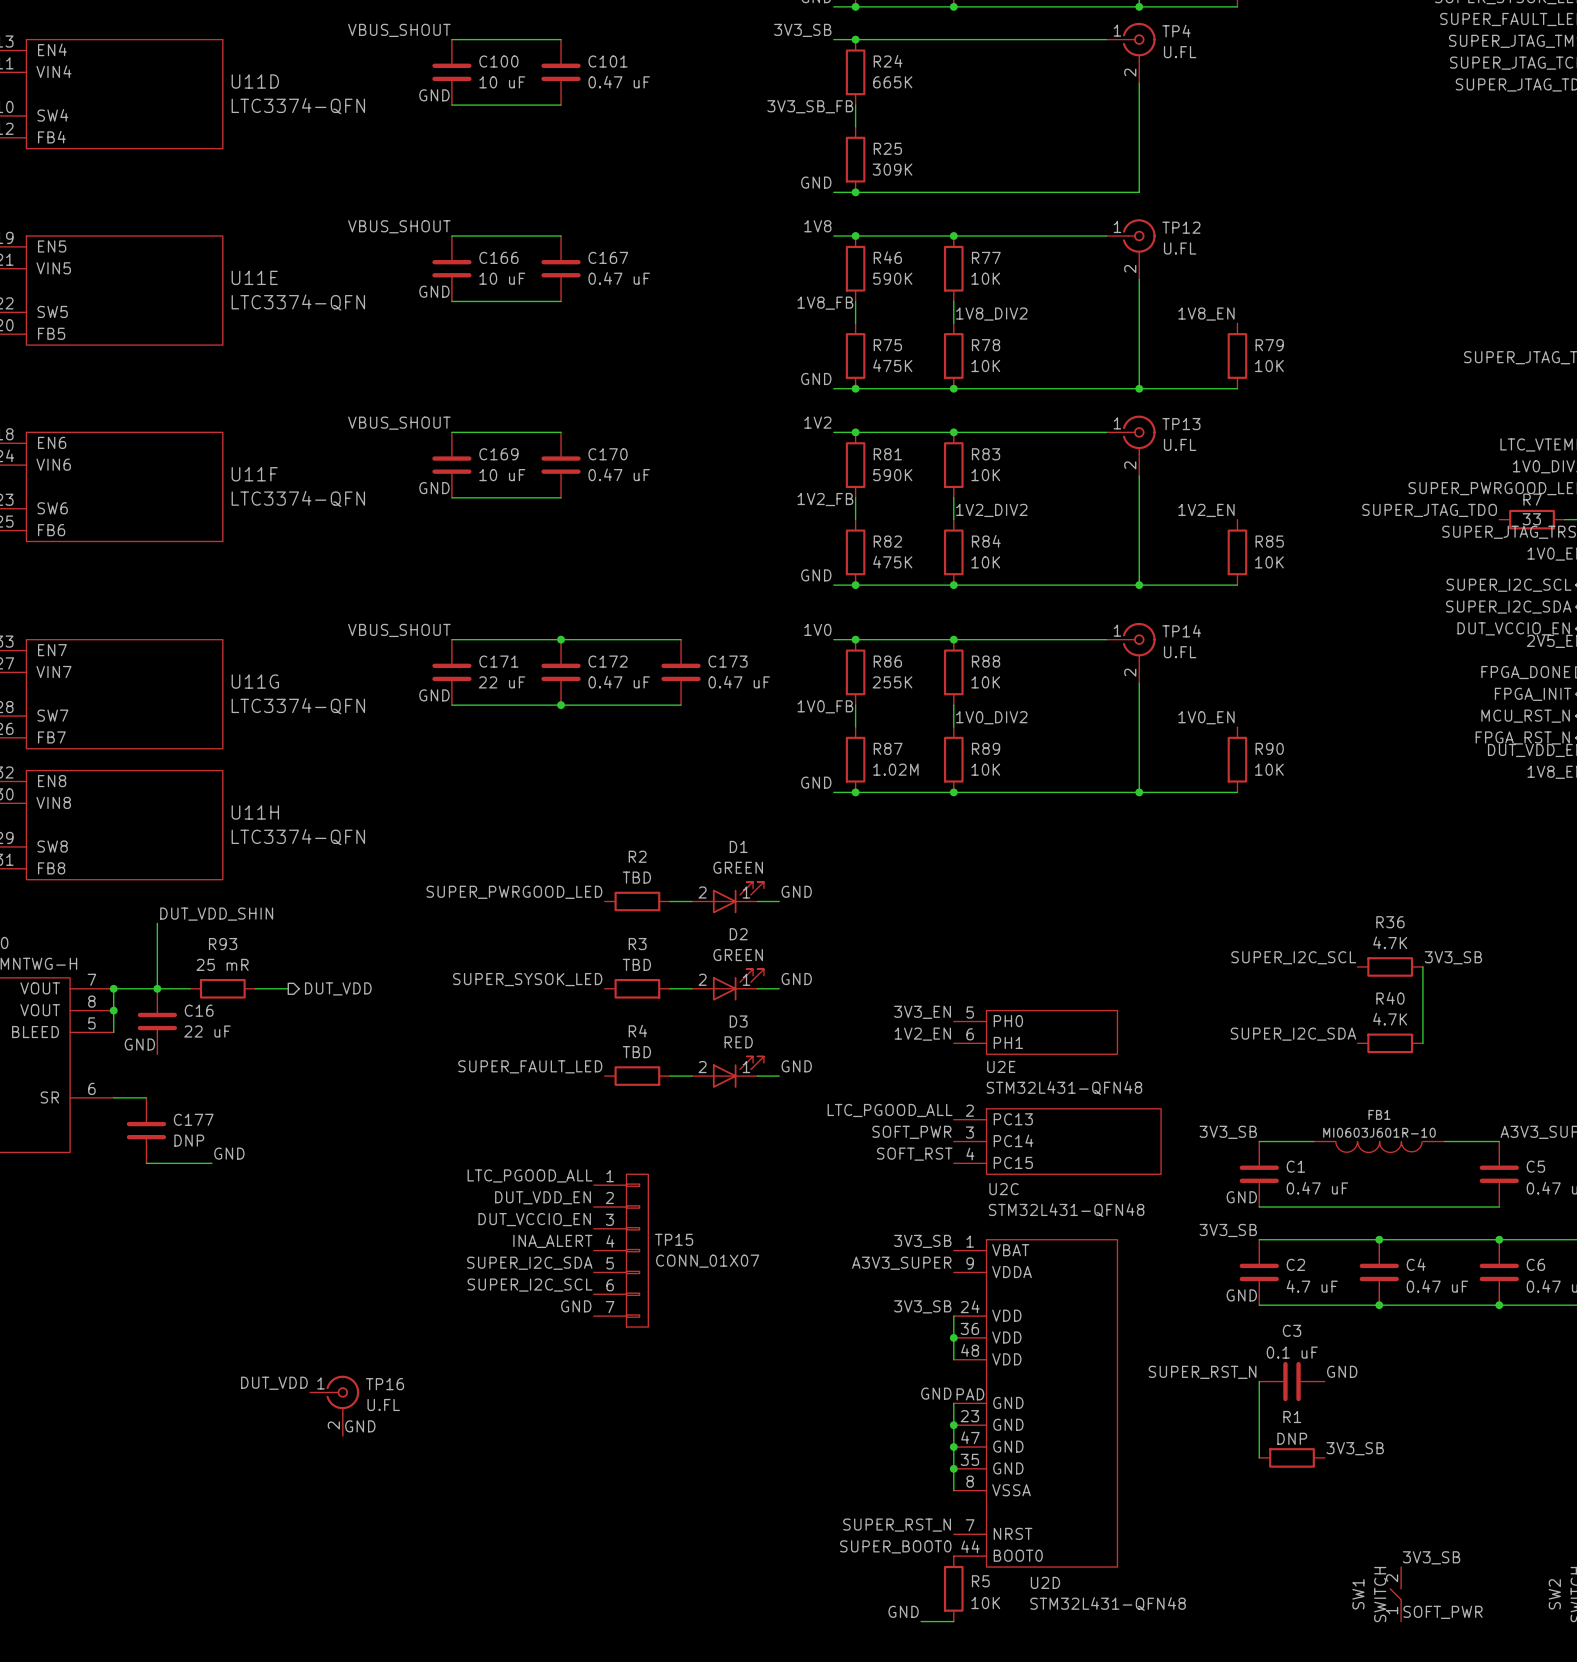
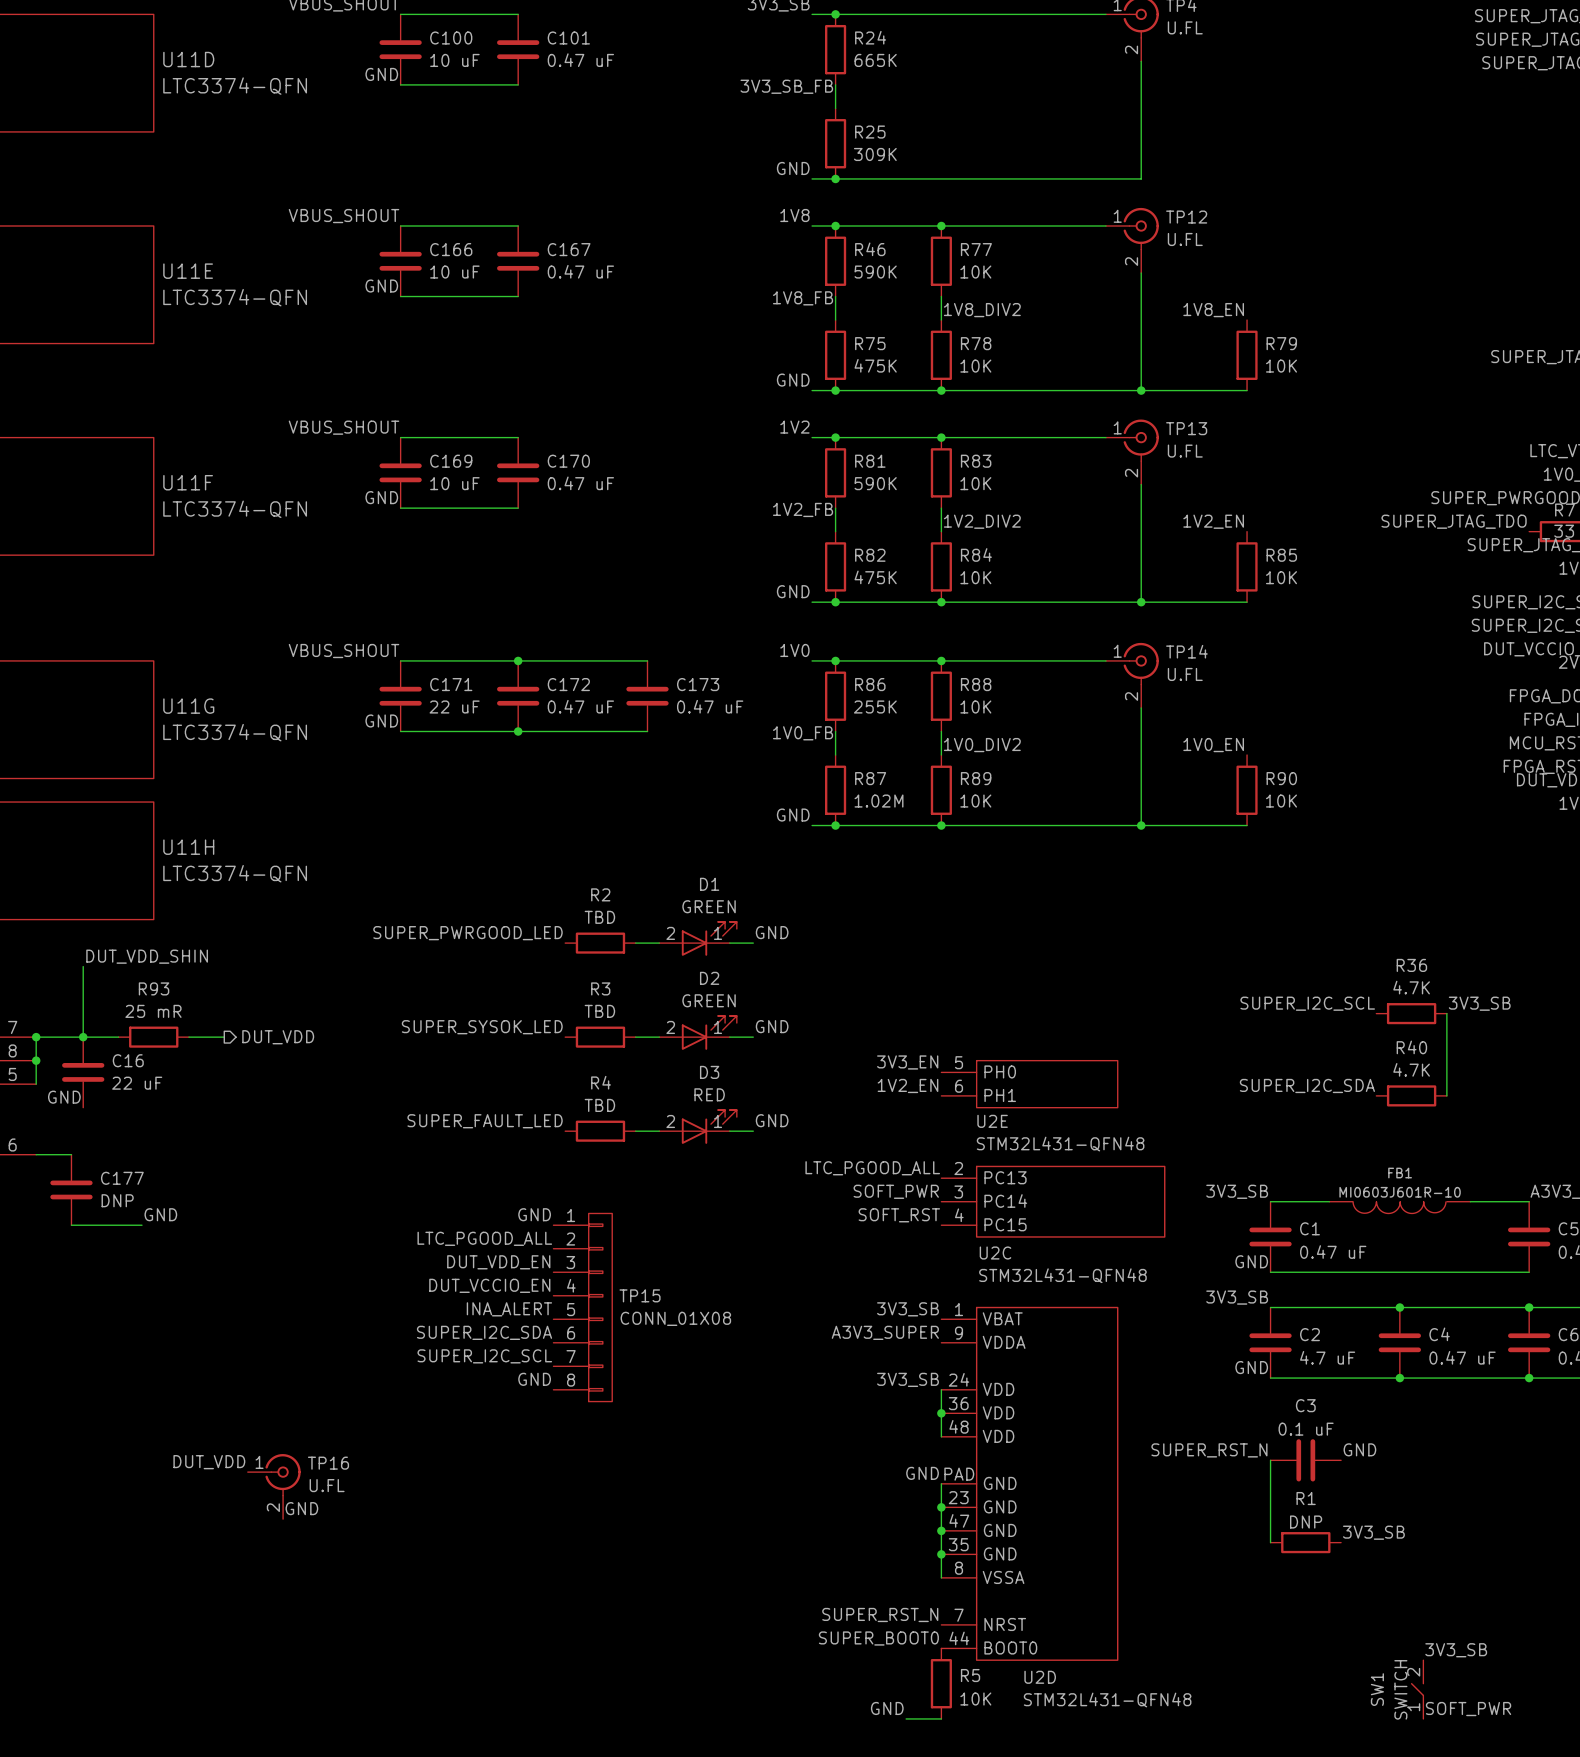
label: none -> GND (534, 1214)
TP15 symbol: [593, 1174, 649, 1328] -> [553, 1213, 613, 1402]
TP15 value: CONN_01X07 (707, 1261) -> CONN_01X08 (675, 1318)

